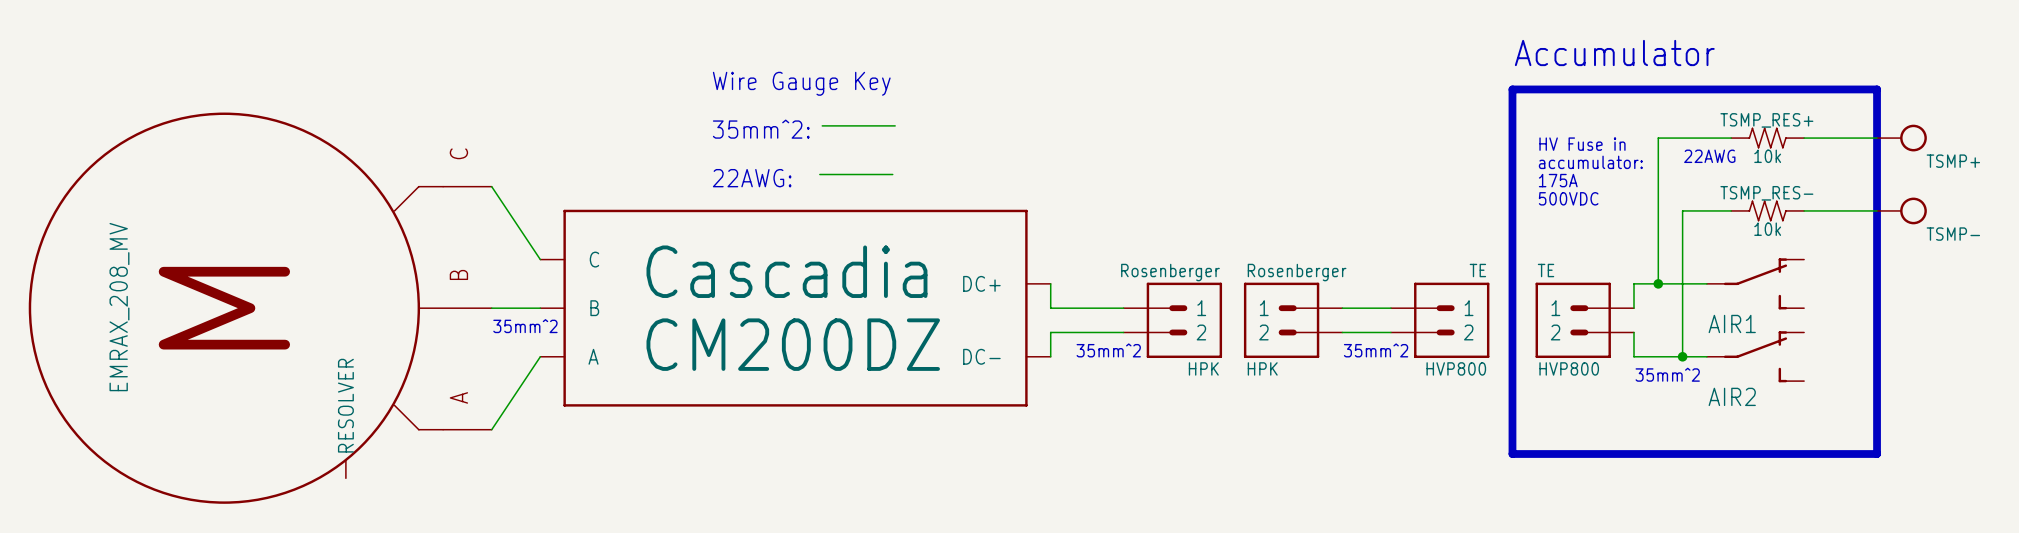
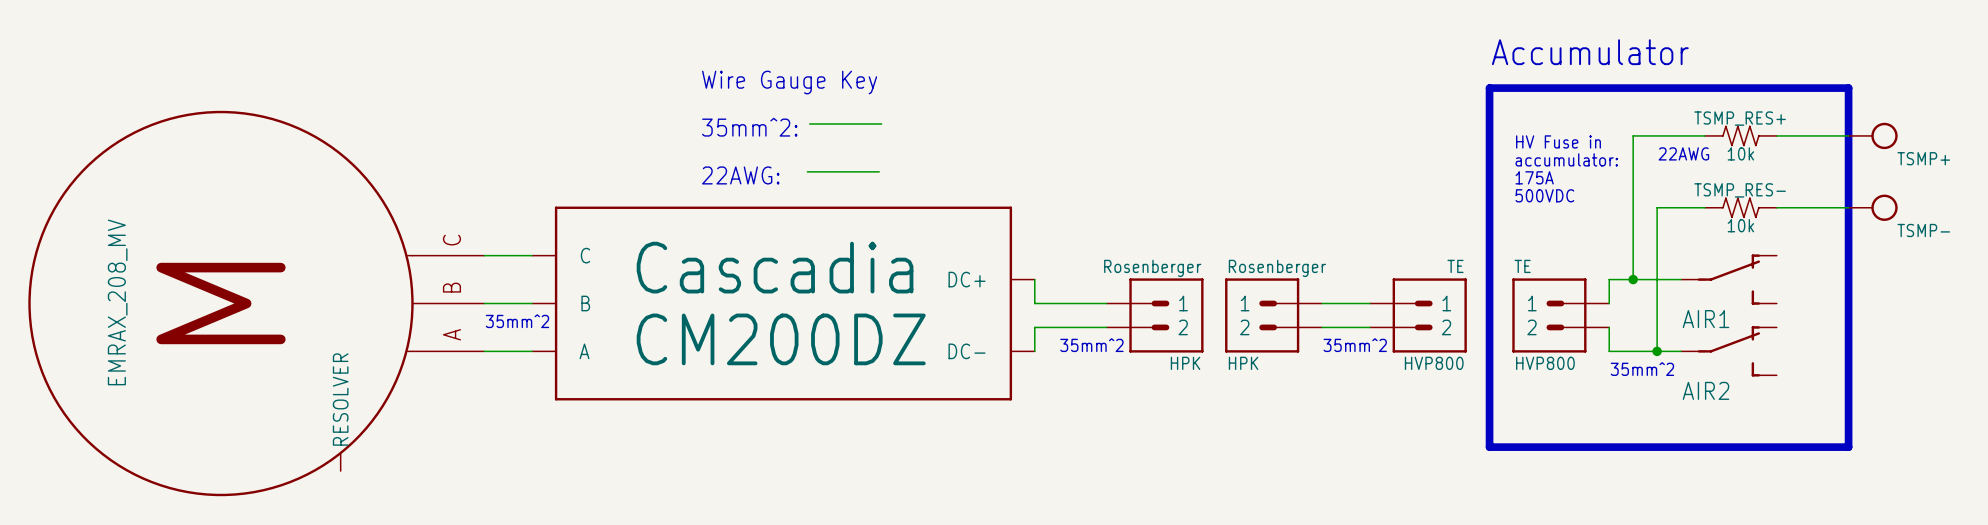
EMRAX_208_MV symbol: [28, 112, 492, 504] -> [28, 110, 485, 497]
wire: (491, 186) (540, 259) -> (484, 255) (532, 255)
wire: (540, 356) (491, 429) -> (532, 351) (484, 351)

